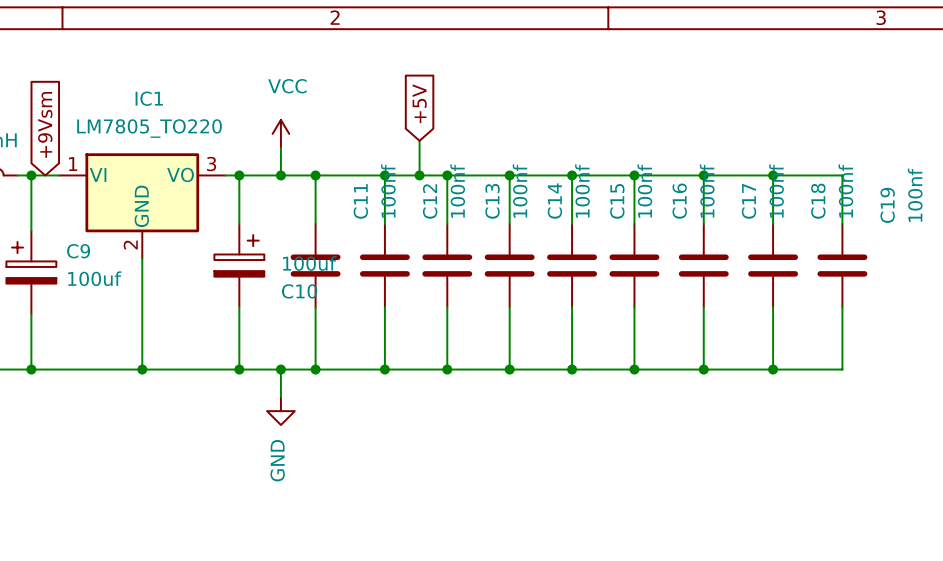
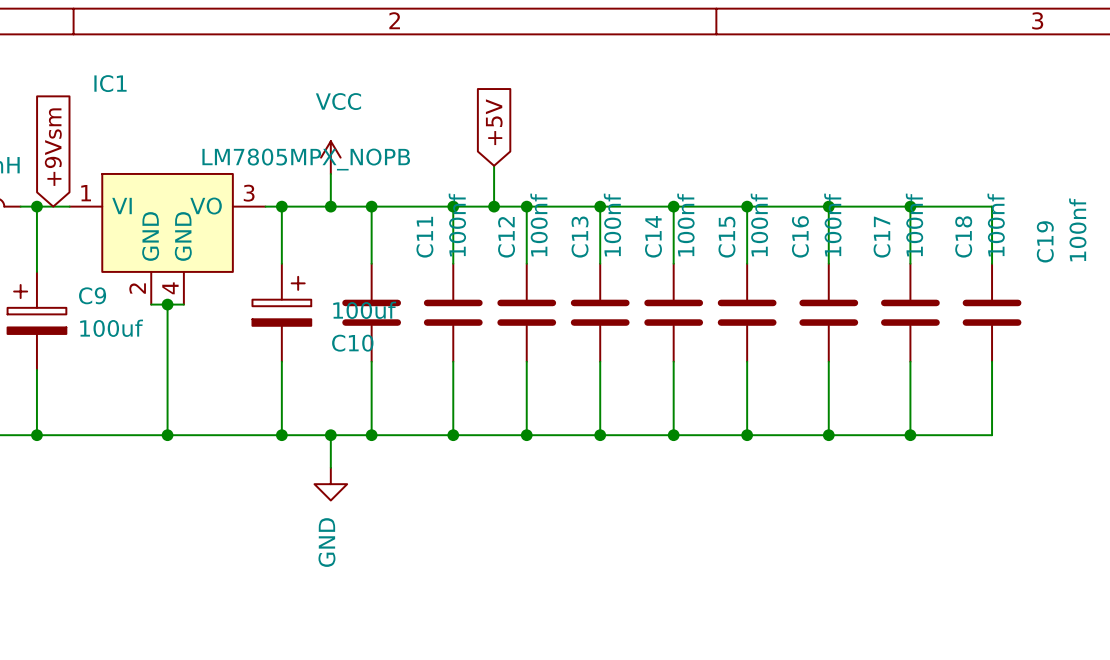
IC1 name position: IC1 (149, 98) -> IC1 (110, 83)
IC1 value: LM7805_TO220 (149, 128) -> LM7805MPX_NOPB (306, 159)
IC1 symbol: [59, 153, 226, 259] -> [69, 173, 266, 305]
wire: none -> (151, 304) (183, 304)
junction: none -> (167, 304)

